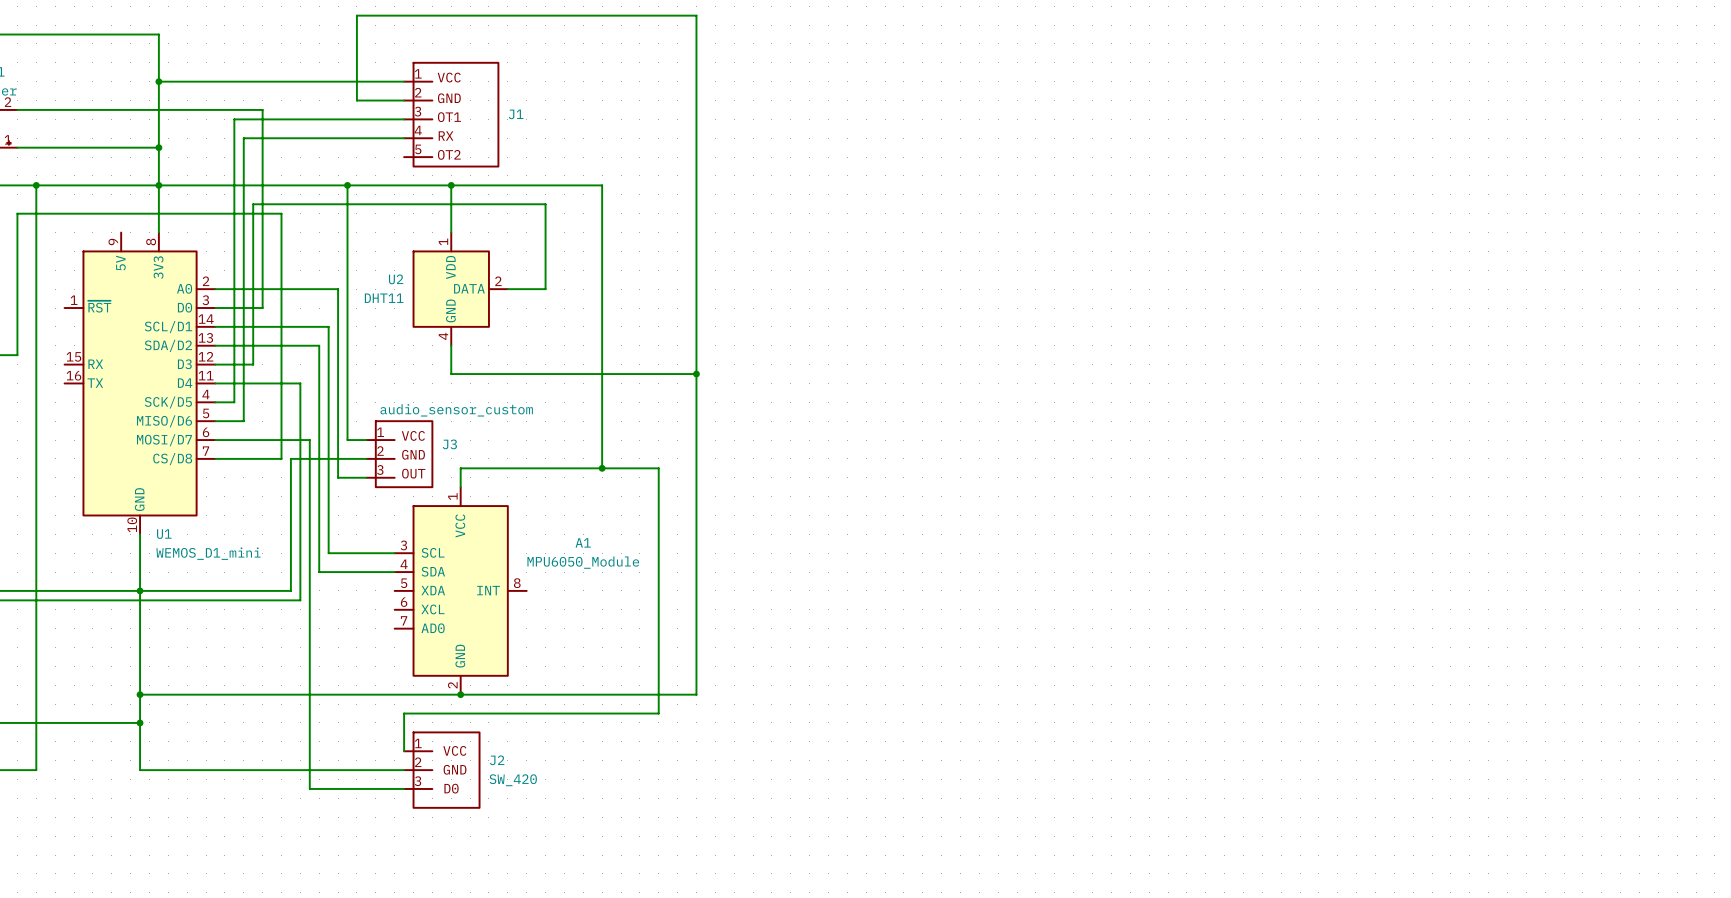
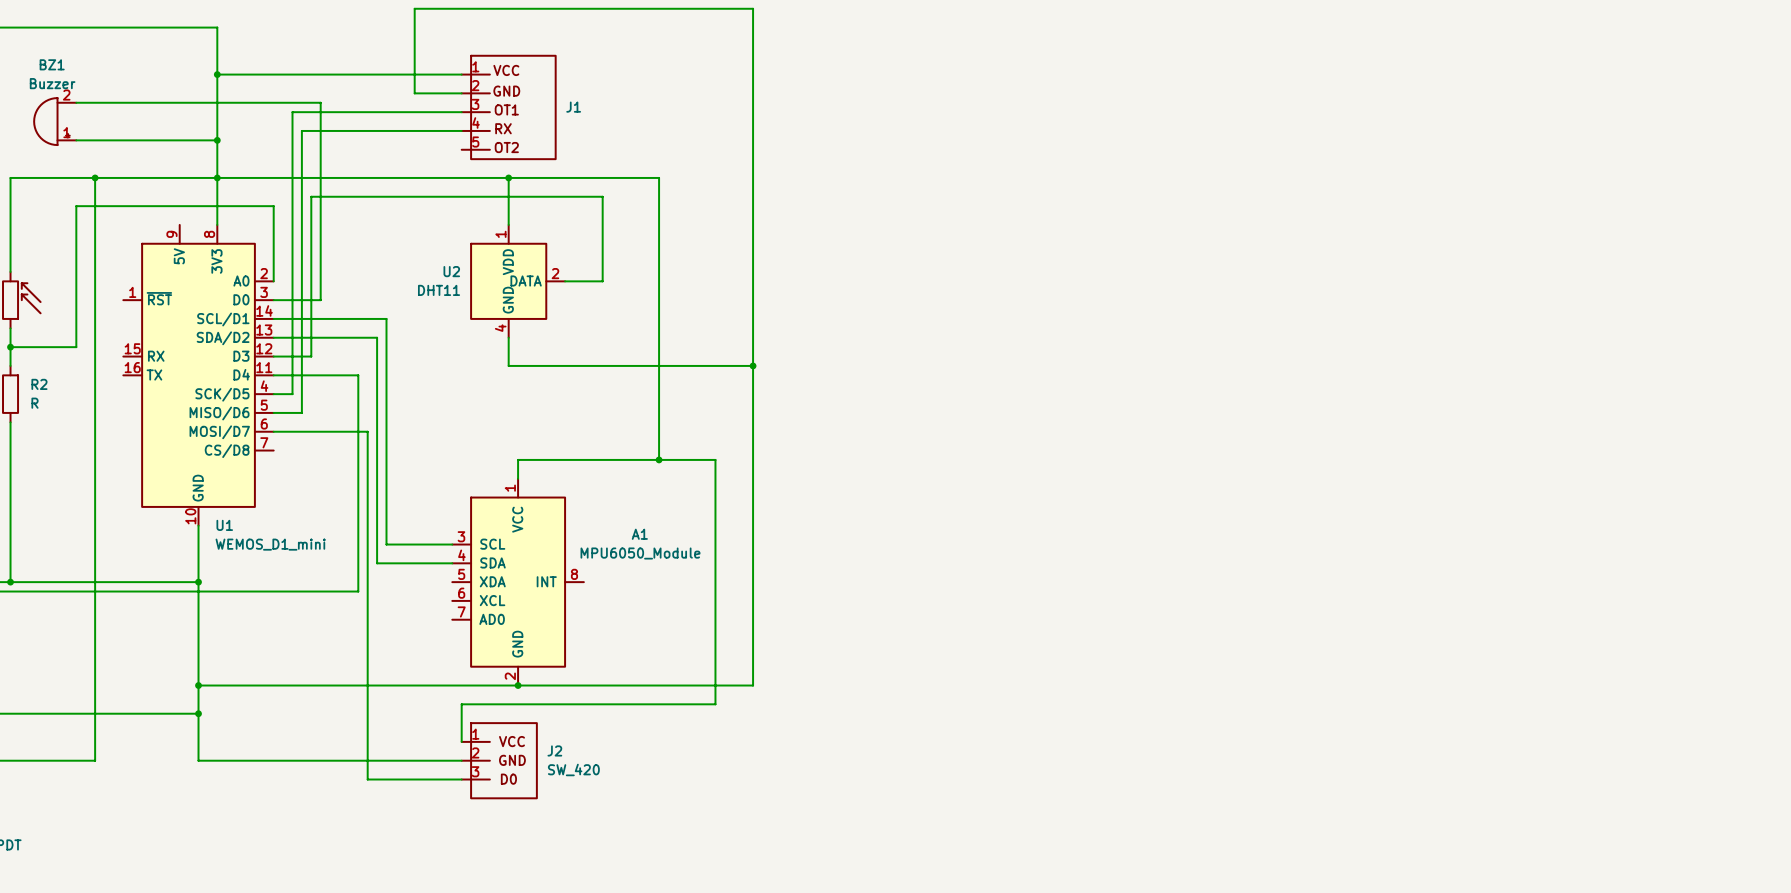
wire: (347, 185) (347, 440) (366, 440) -> none
junction: (347, 185) -> none
wire: (215, 213) (281, 213) (281, 458) (215, 458) -> (273, 206) (273, 281)
wire: (215, 289) (338, 289) (338, 477) (366, 477) -> none
J3: audio_sensor_custom (399, 454) -> none
wire: (366, 458) (290, 458) (290, 590) (140, 590) -> none

